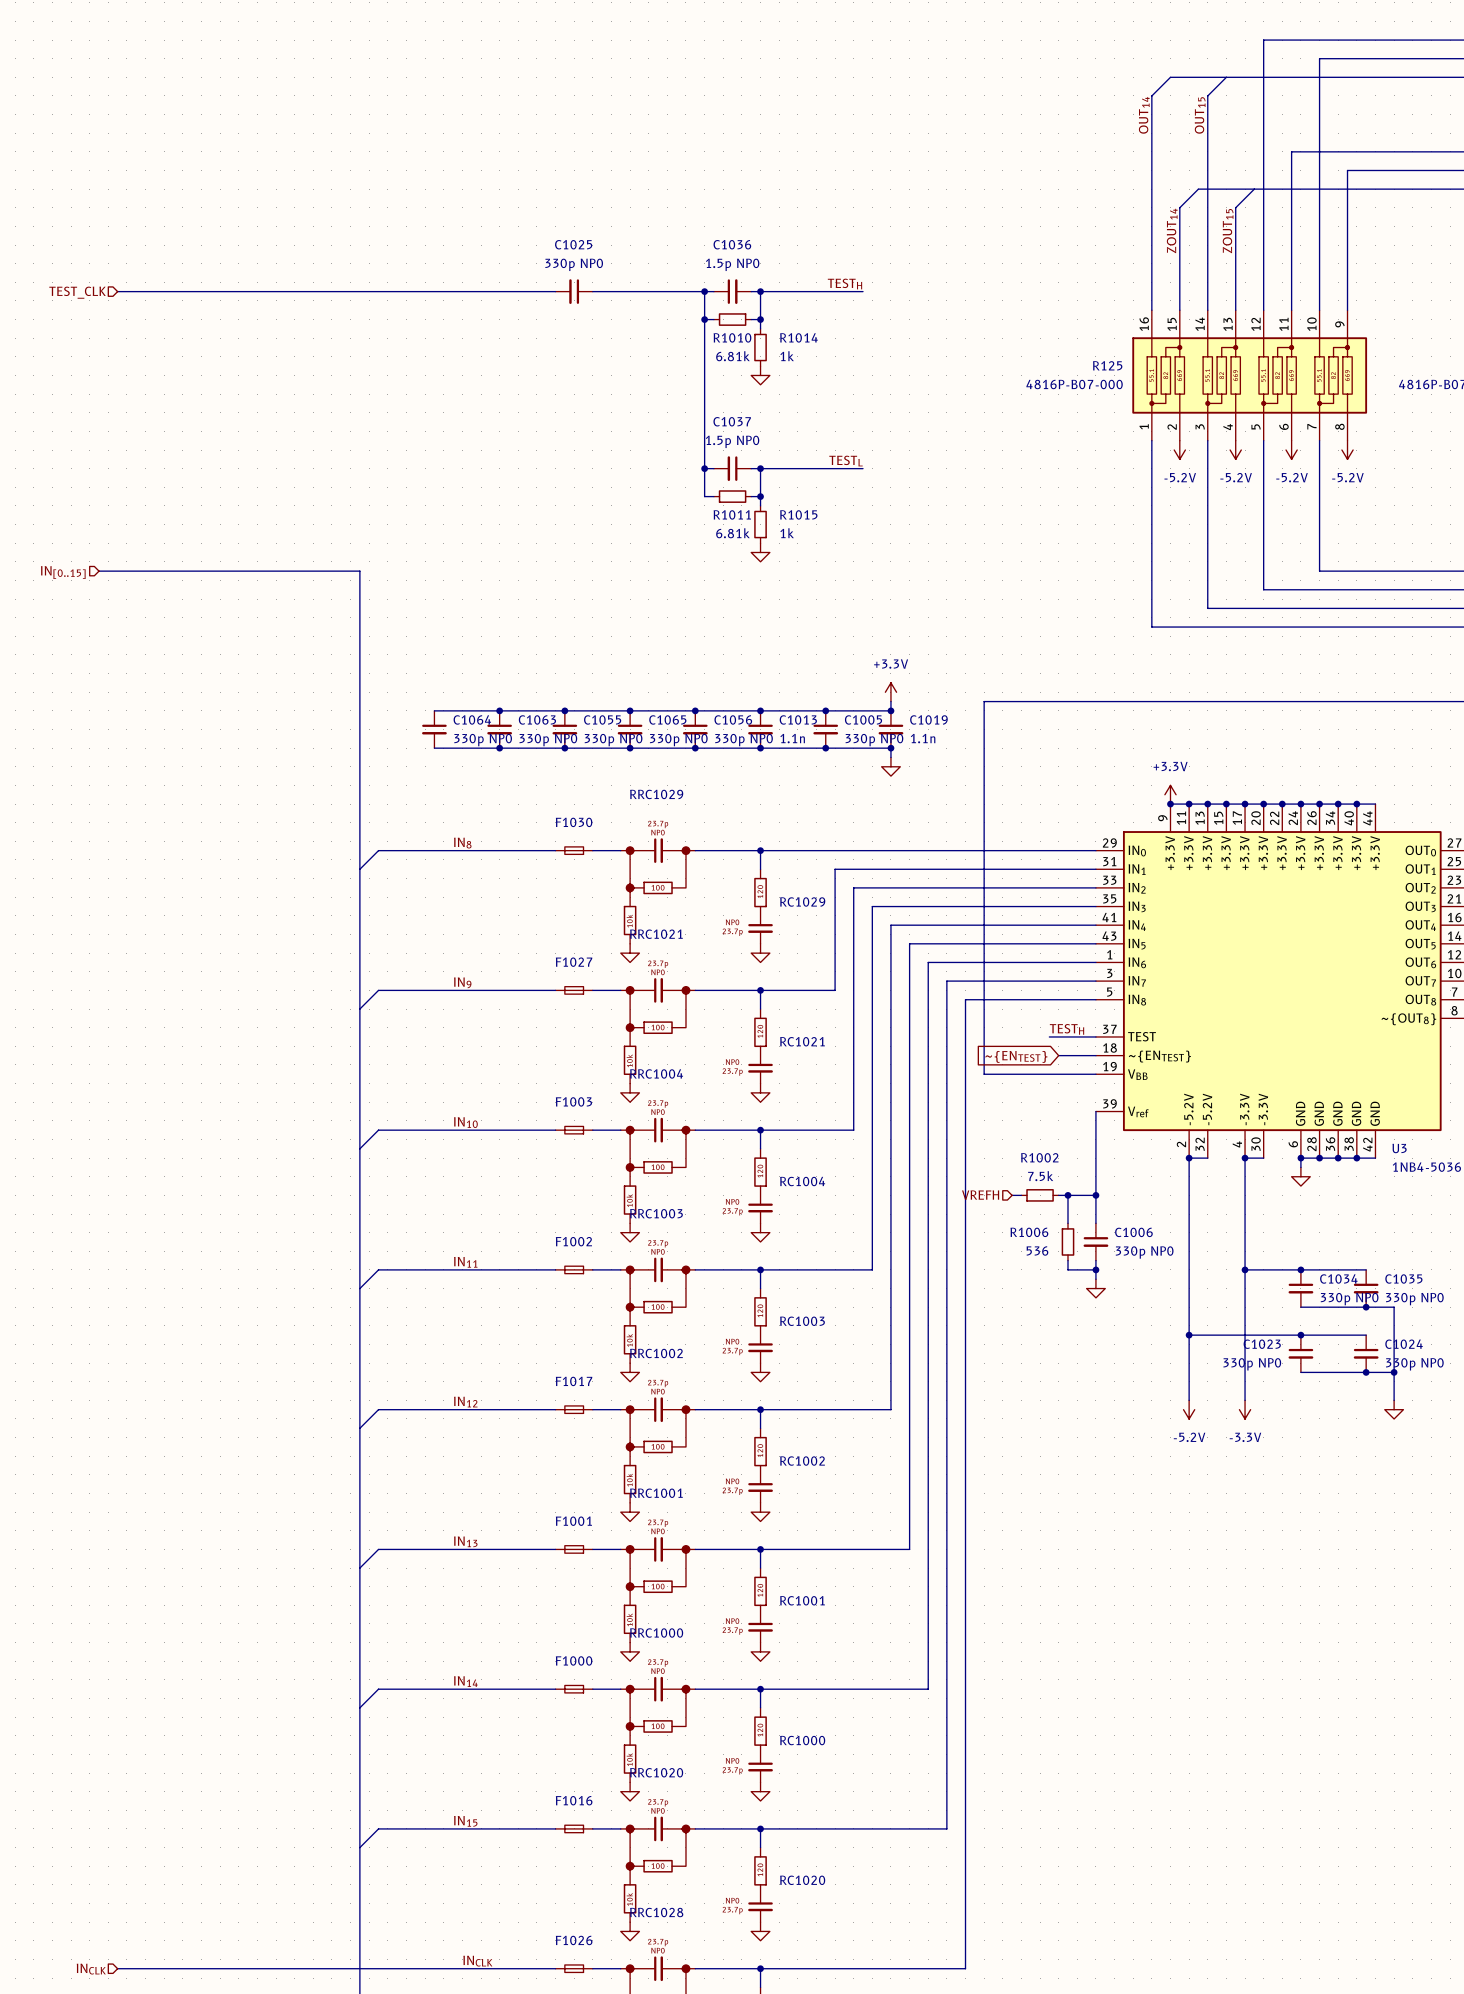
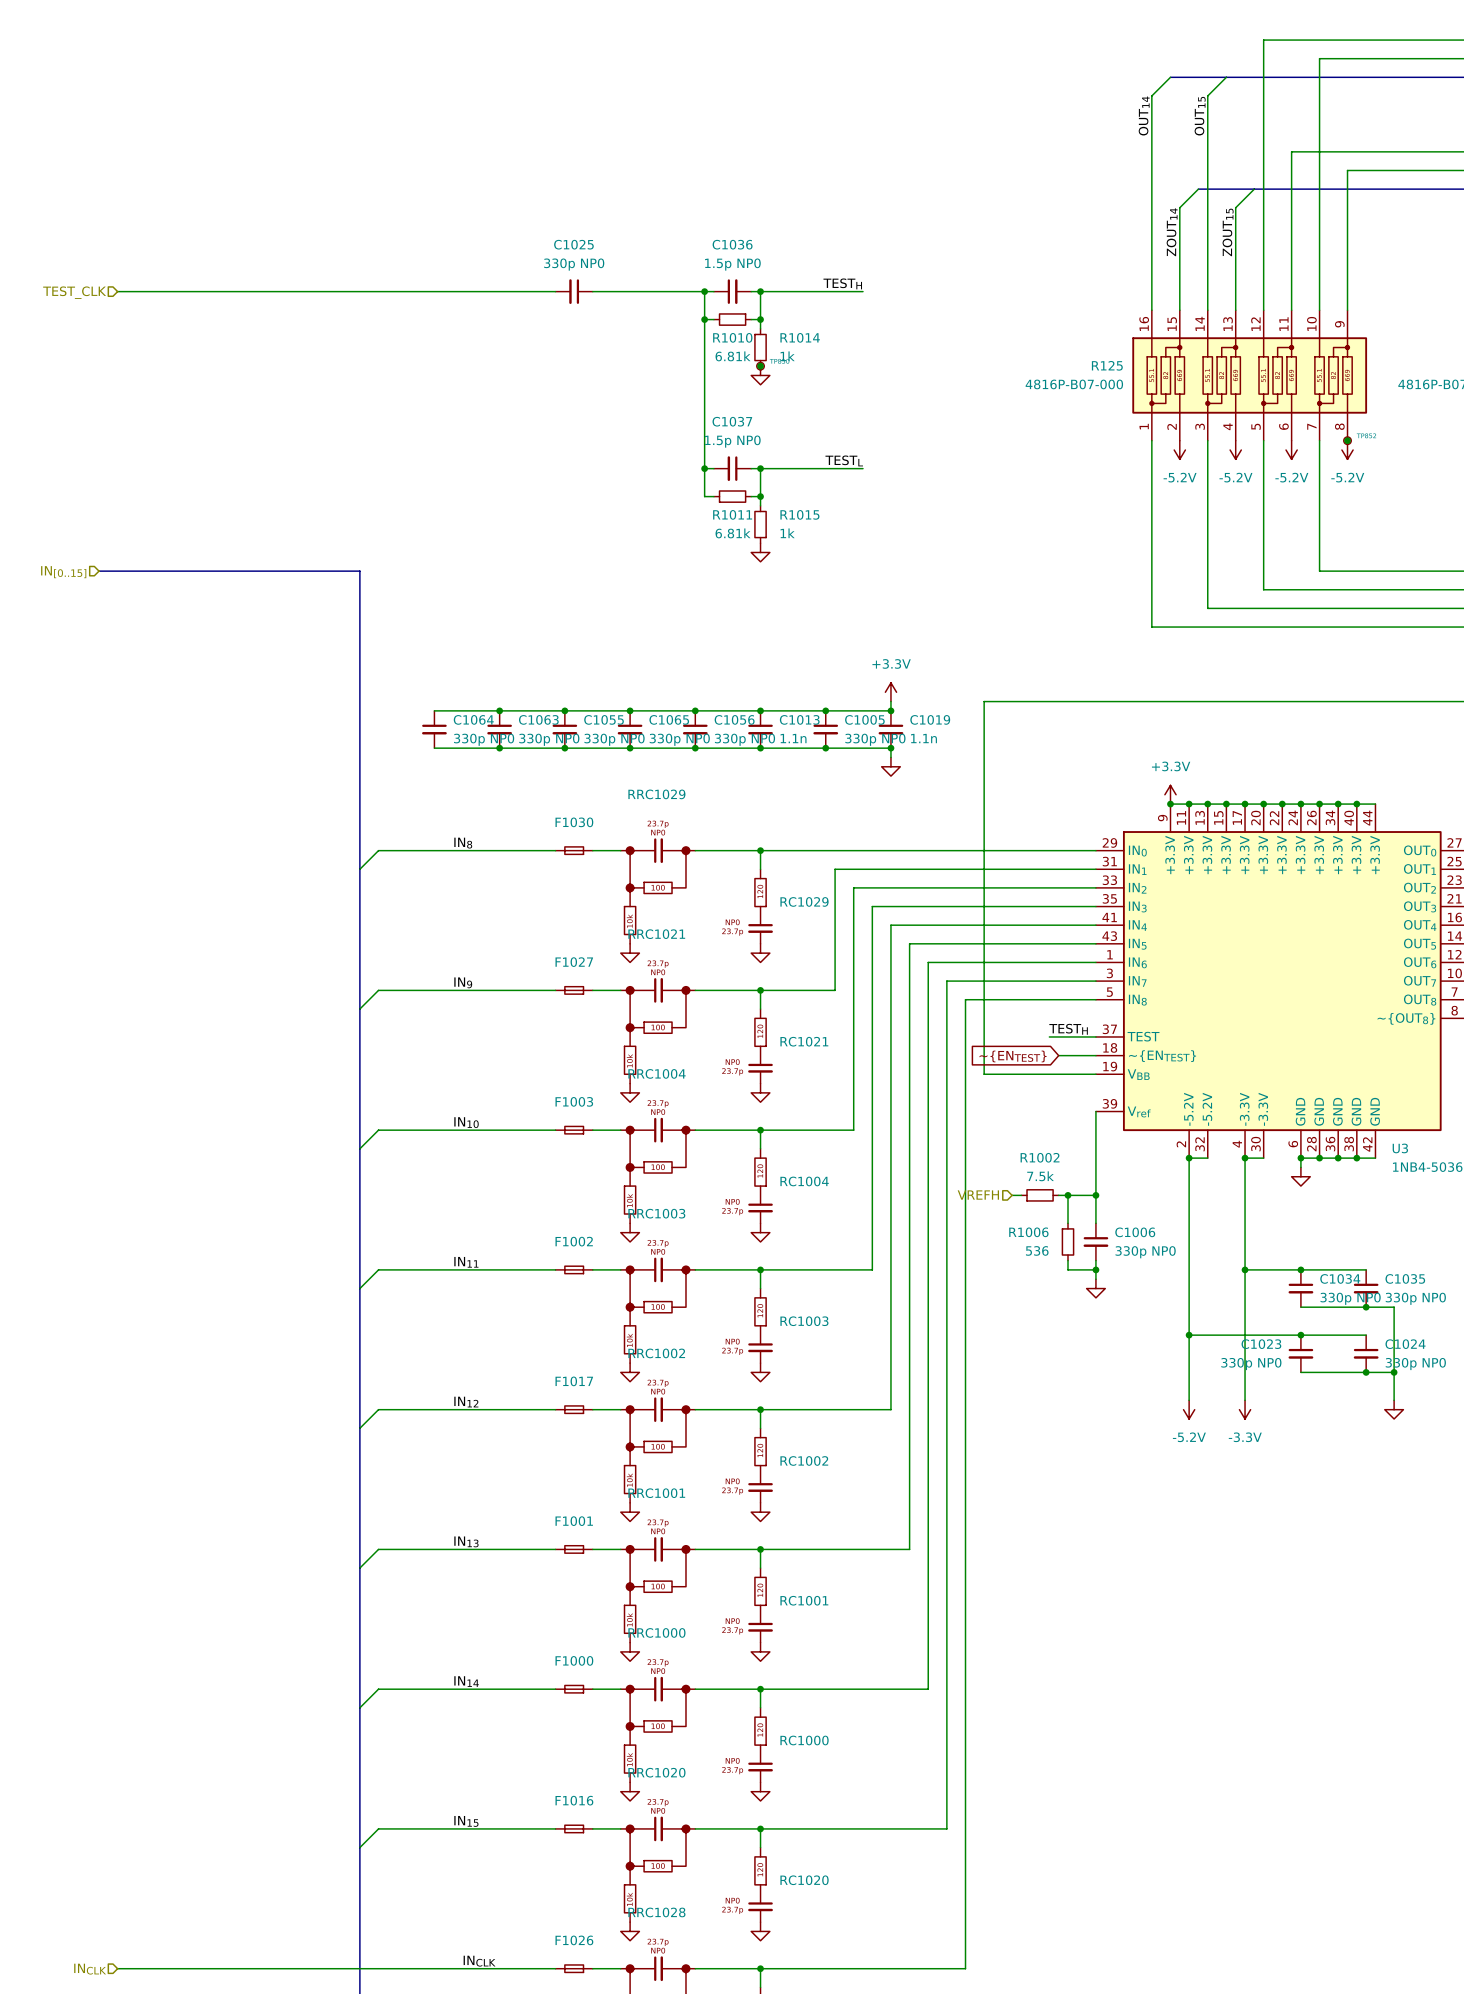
junction: none -> (760, 366)
part: none -> (760, 366)
junction: none -> (1347, 440)
part: none -> (1347, 440)

